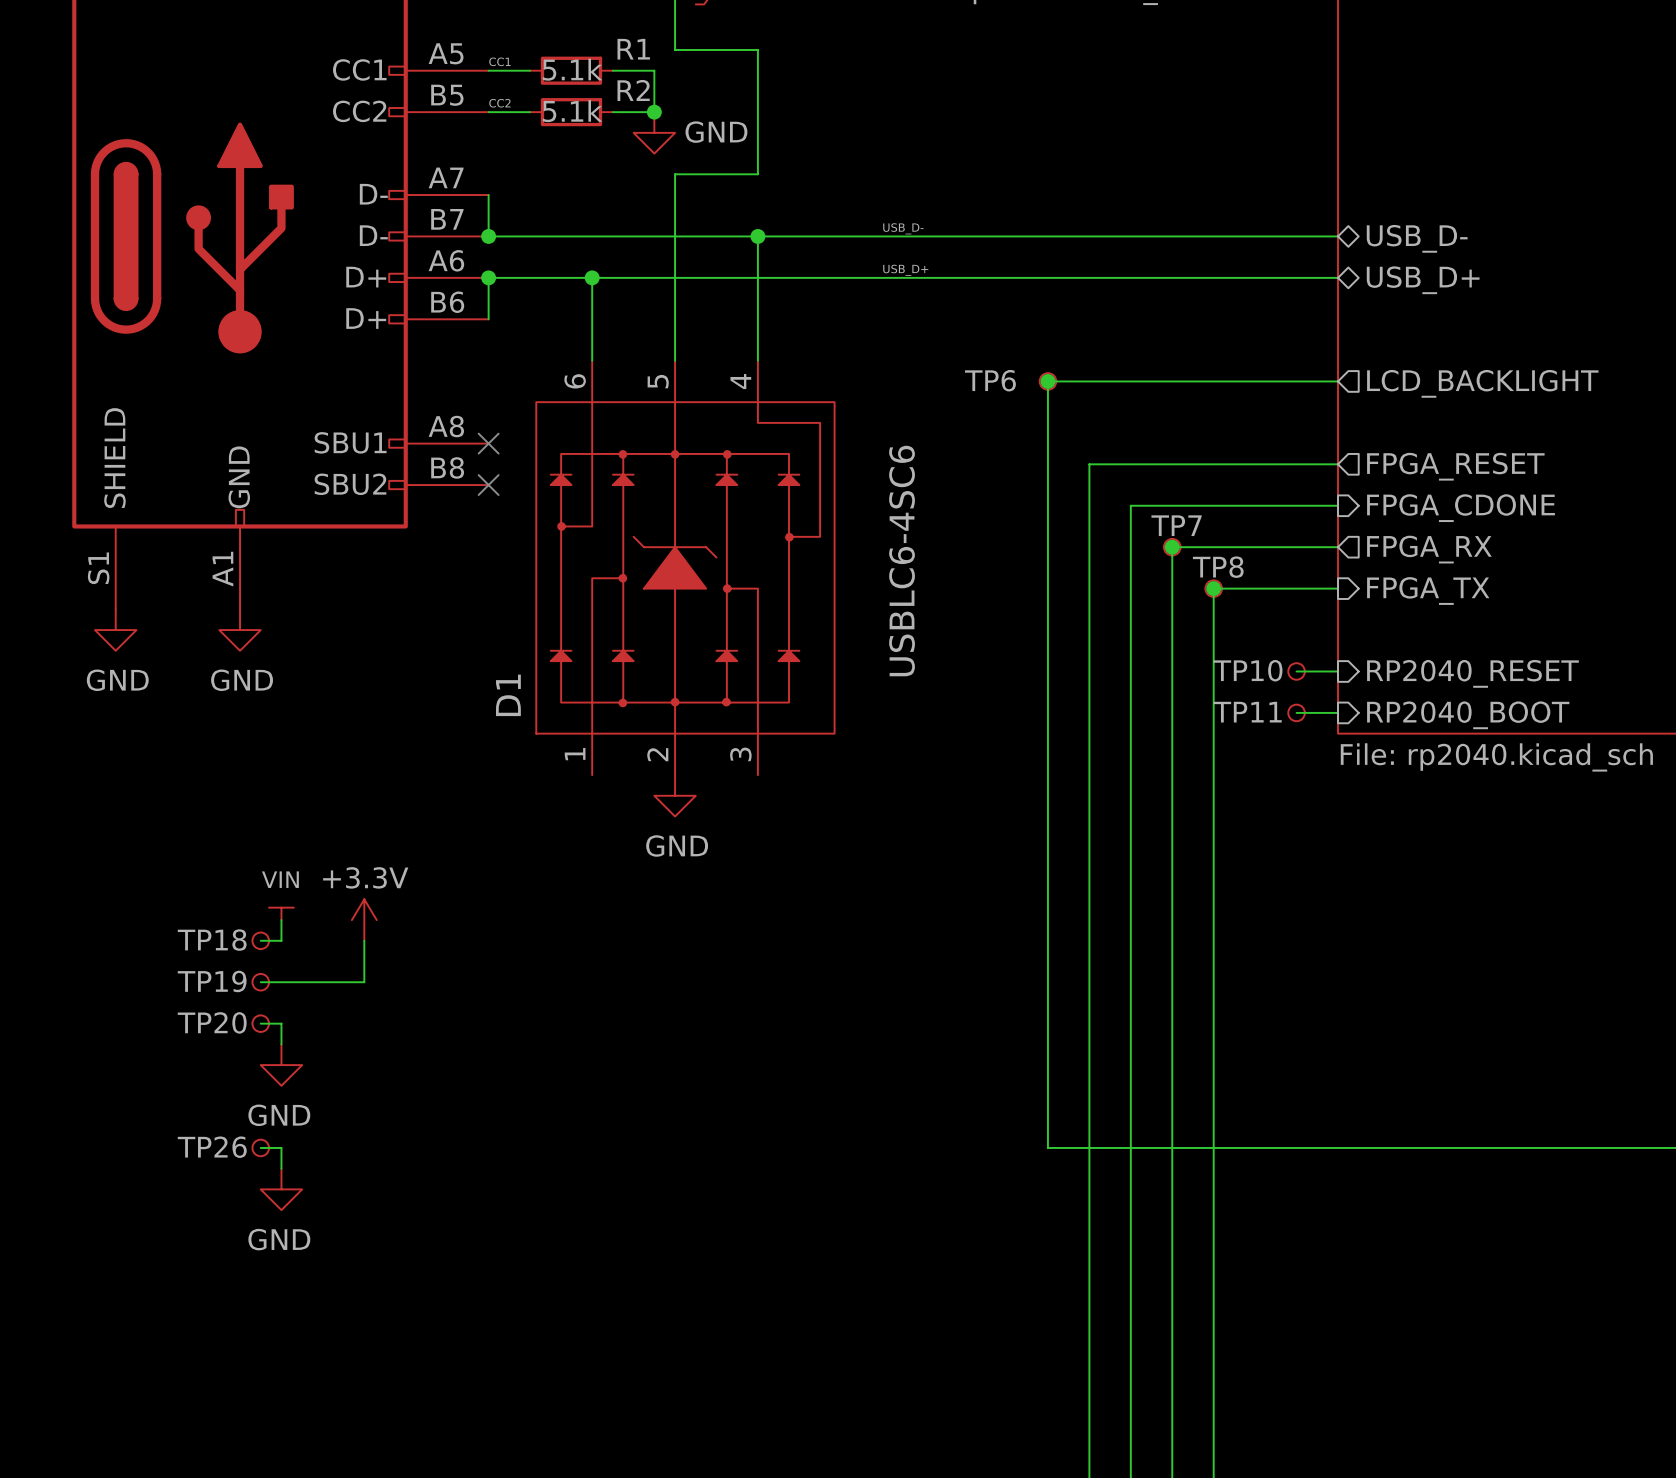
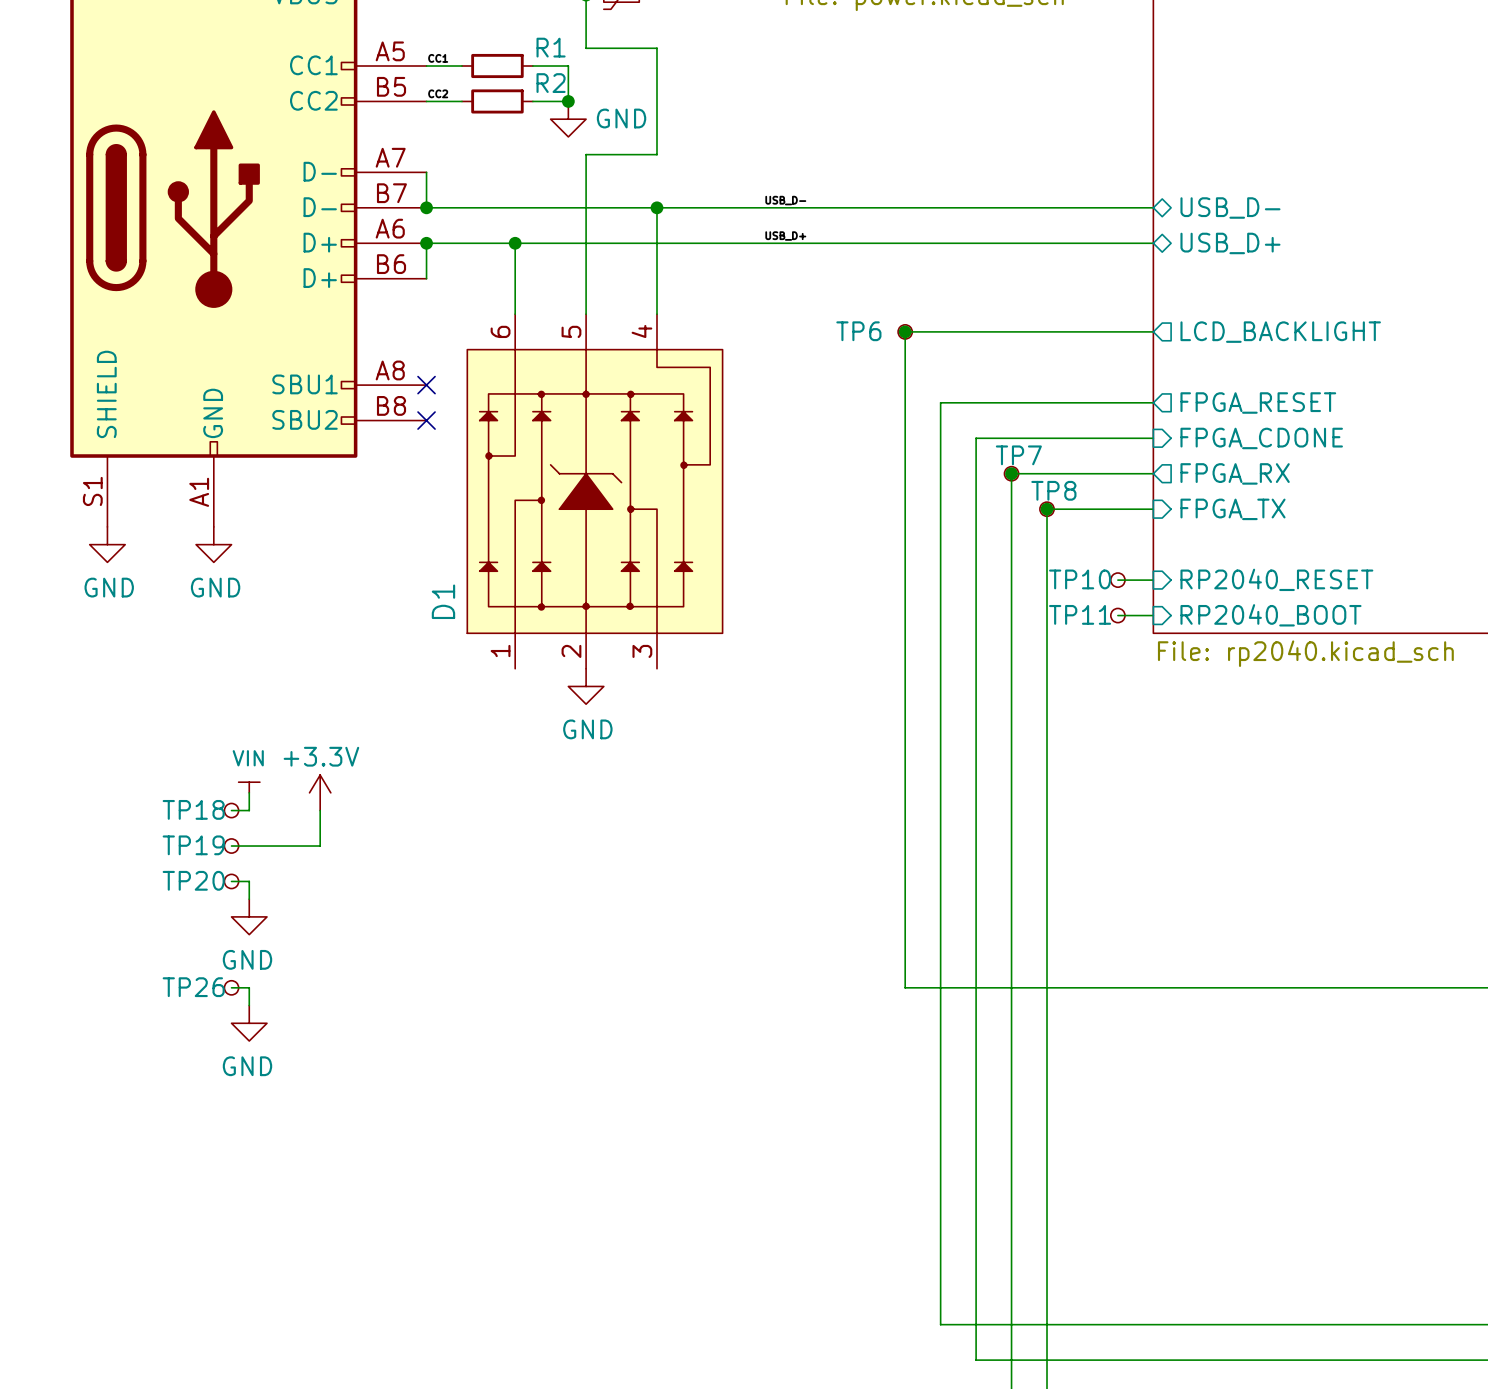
R1 value: 5.1k (572, 69) -> none
R2 value: 5.1k (572, 111) -> none
D1 value: USBLC6-4SC6 (902, 561) -> none

